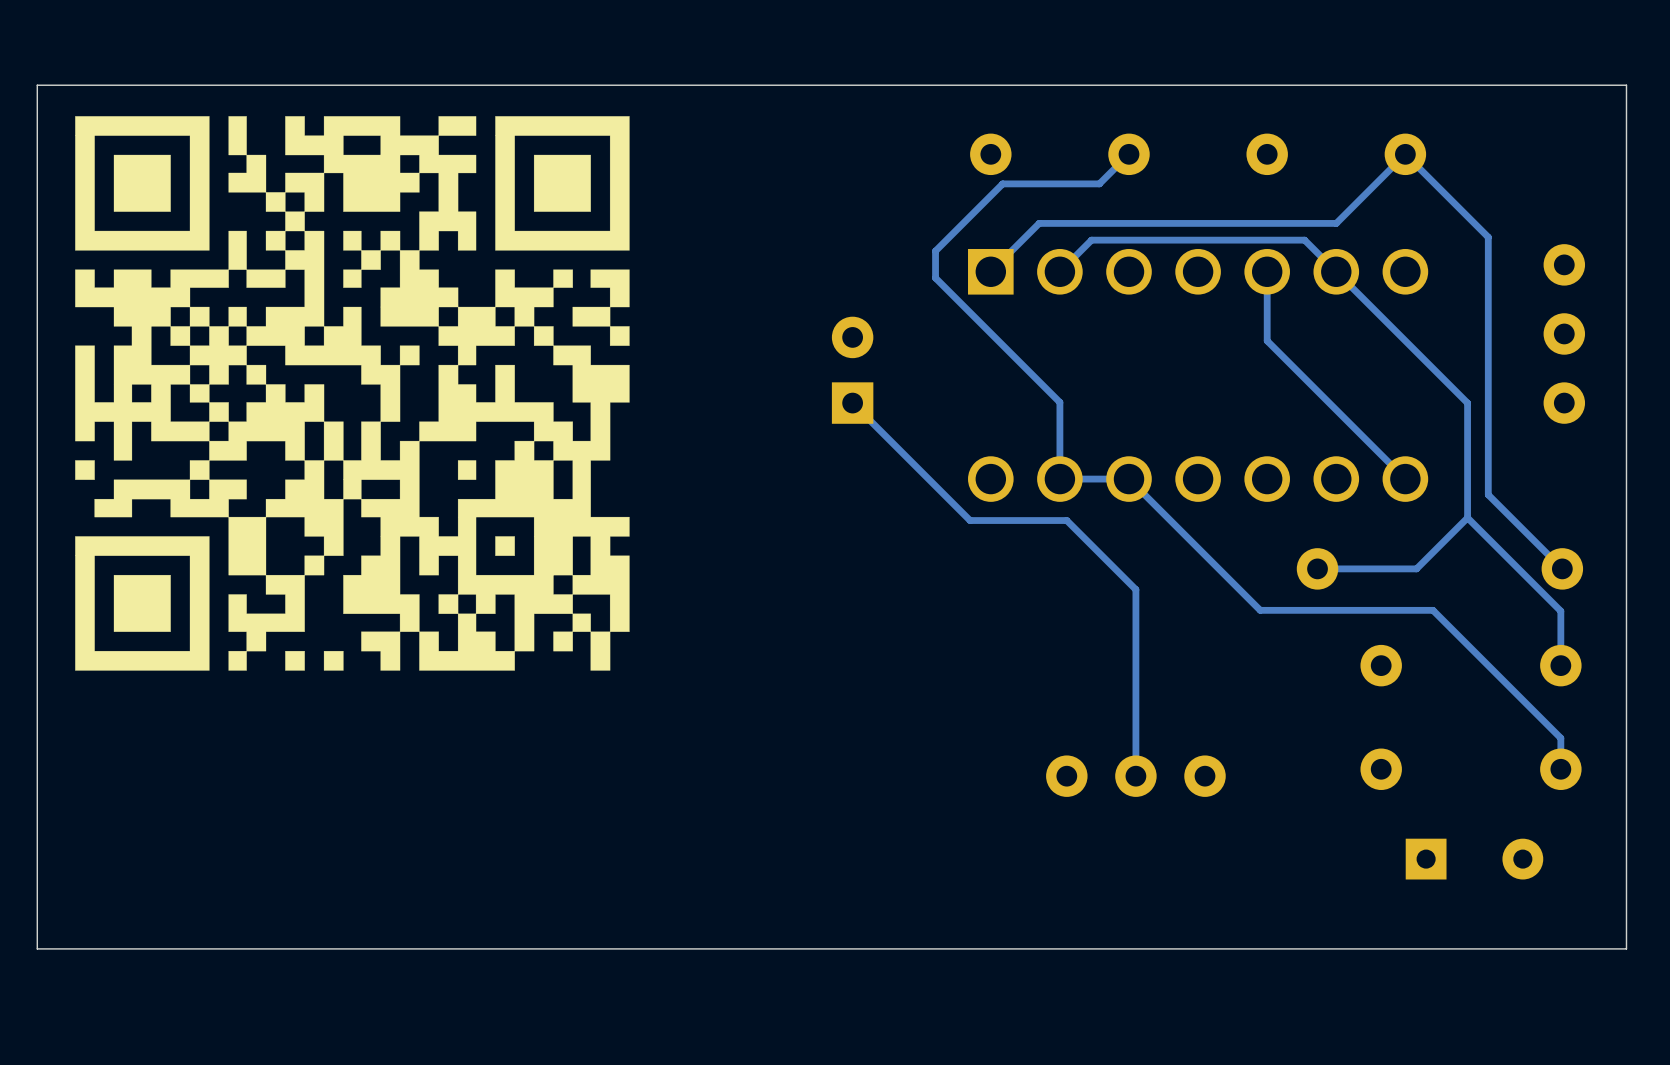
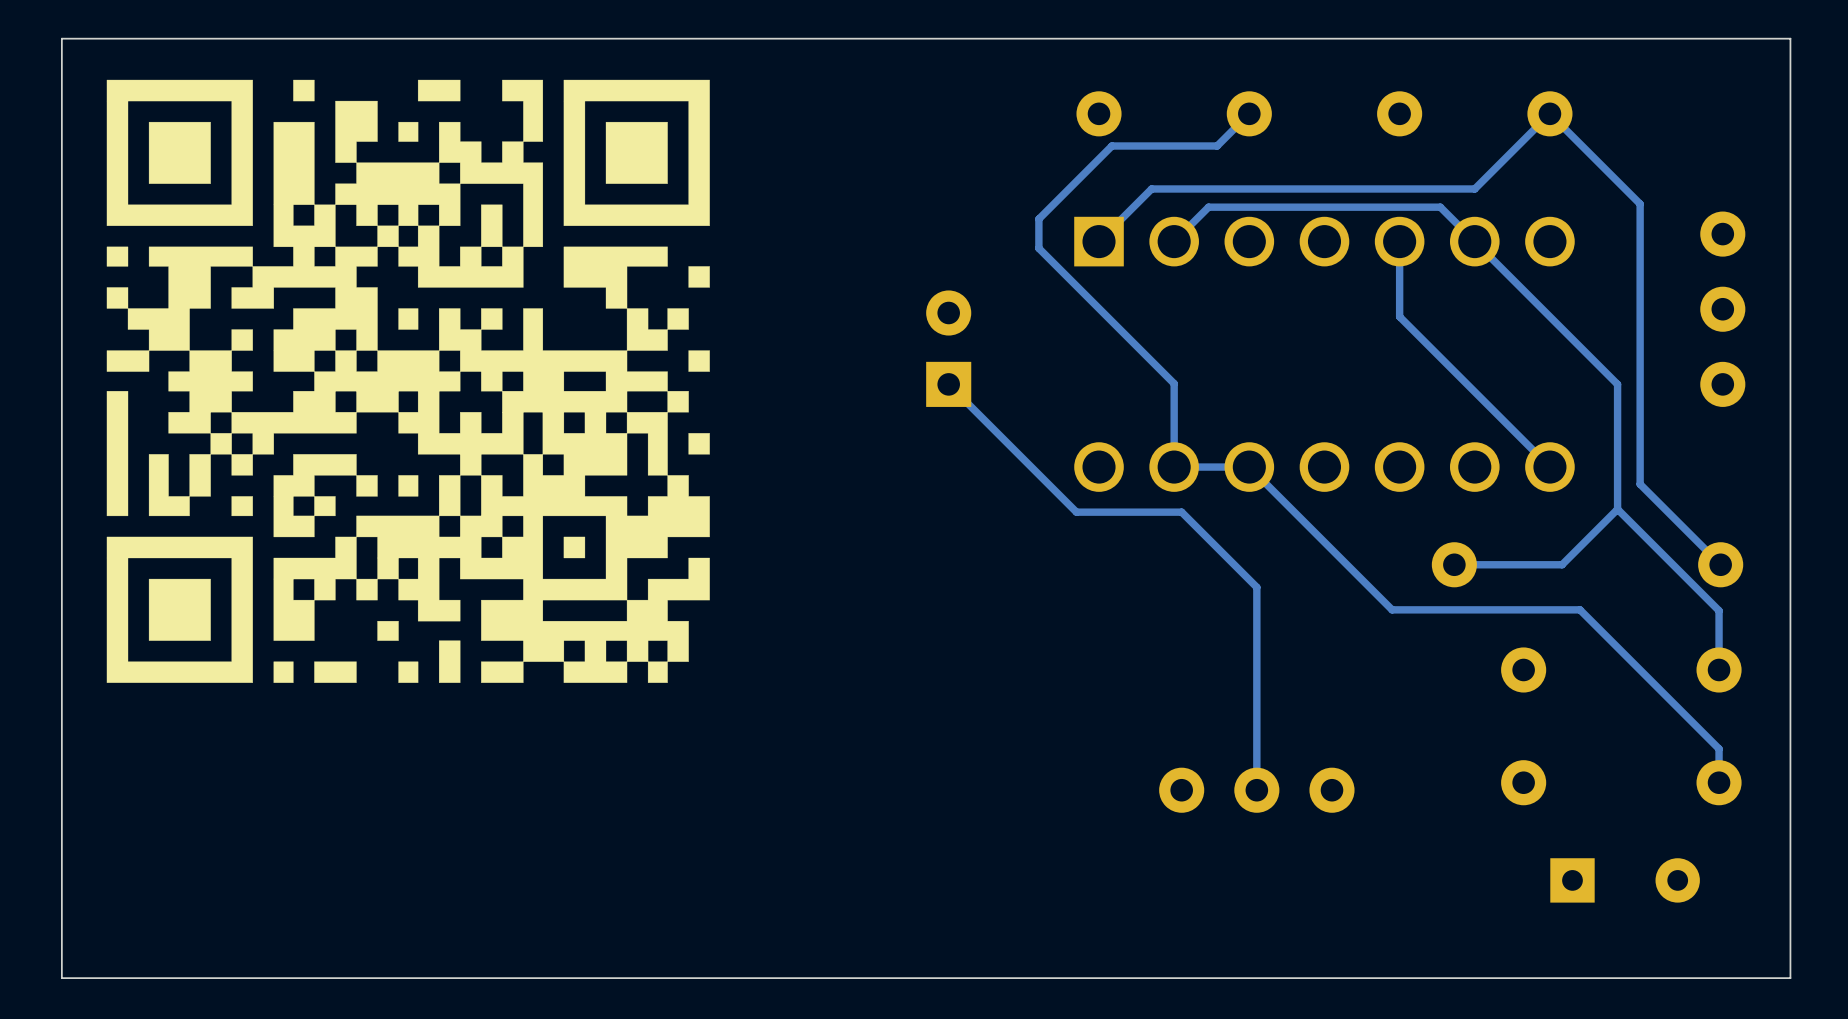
drawing shape: [75, 116, 630, 671] -> [106, 79, 710, 683]

